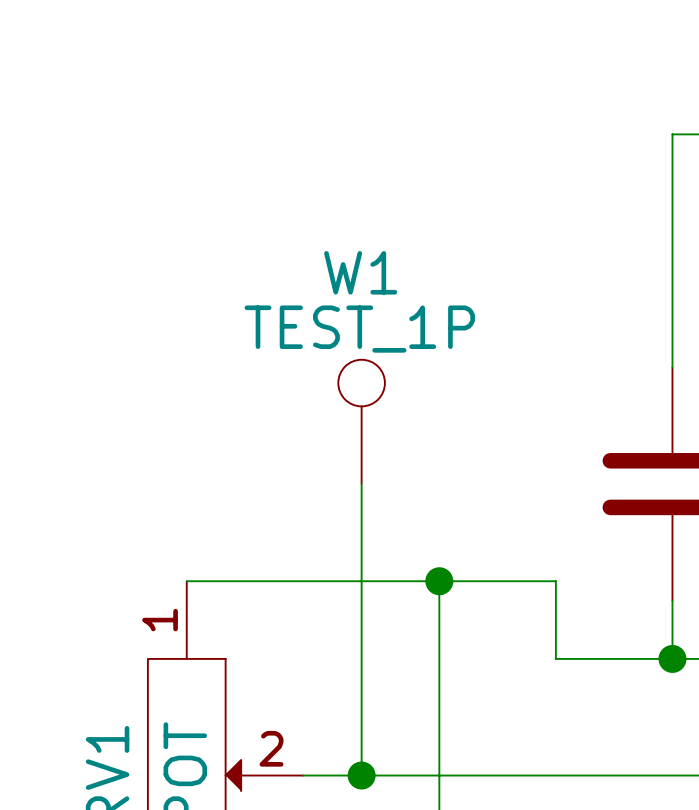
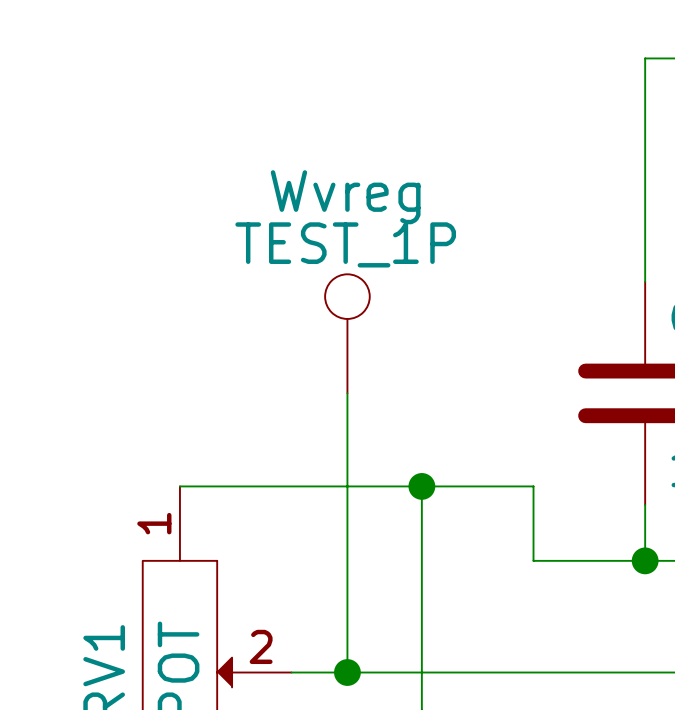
W1 name: W1 (360, 272) -> Wvreg (345, 197)

